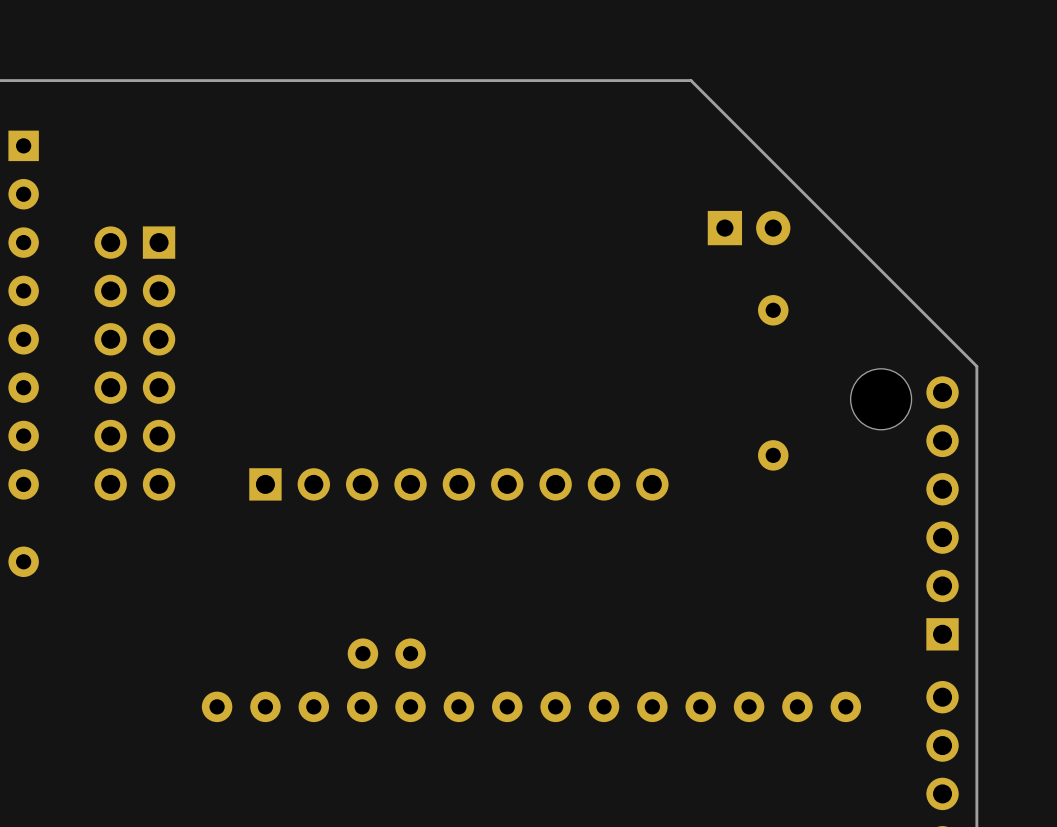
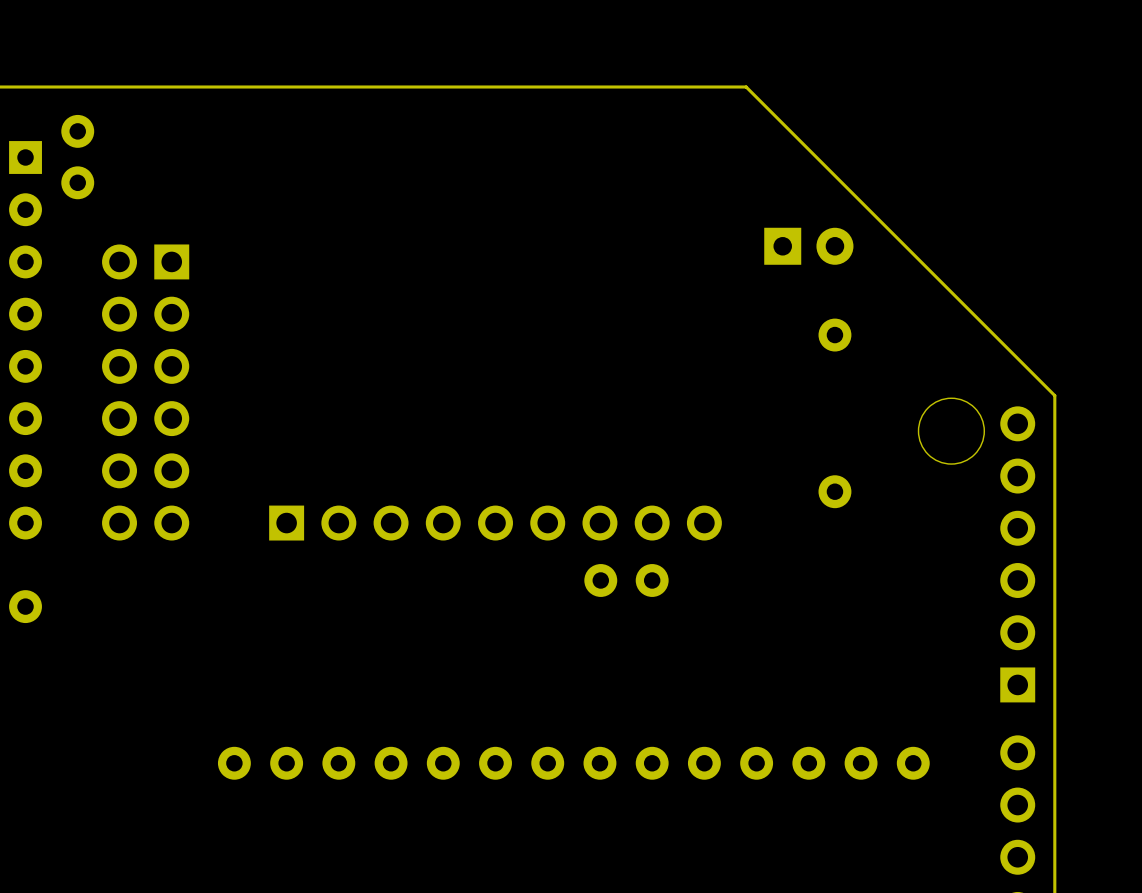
part: none -> (77, 157)
part position: (386, 653) -> (626, 580)

